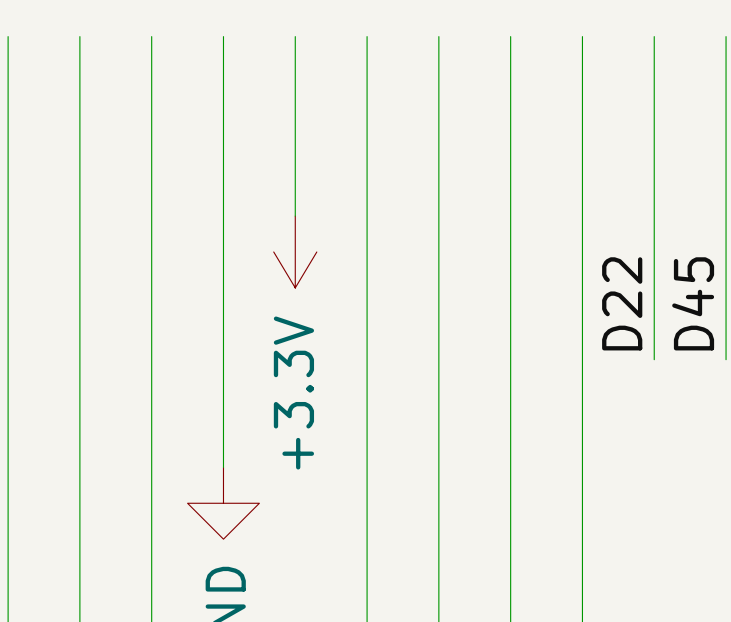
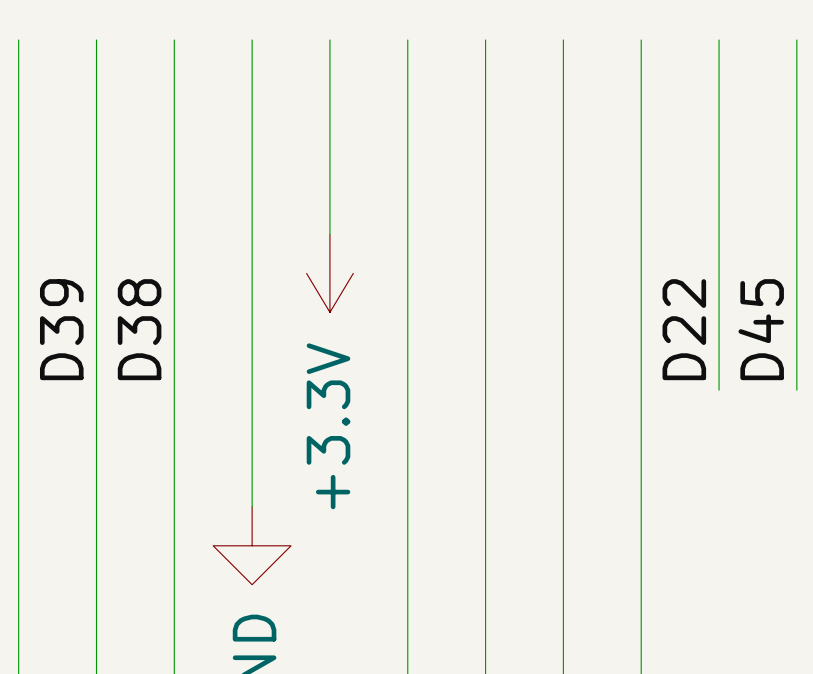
label: none -> D39 (61, 329)
label: none -> D38 (139, 329)

